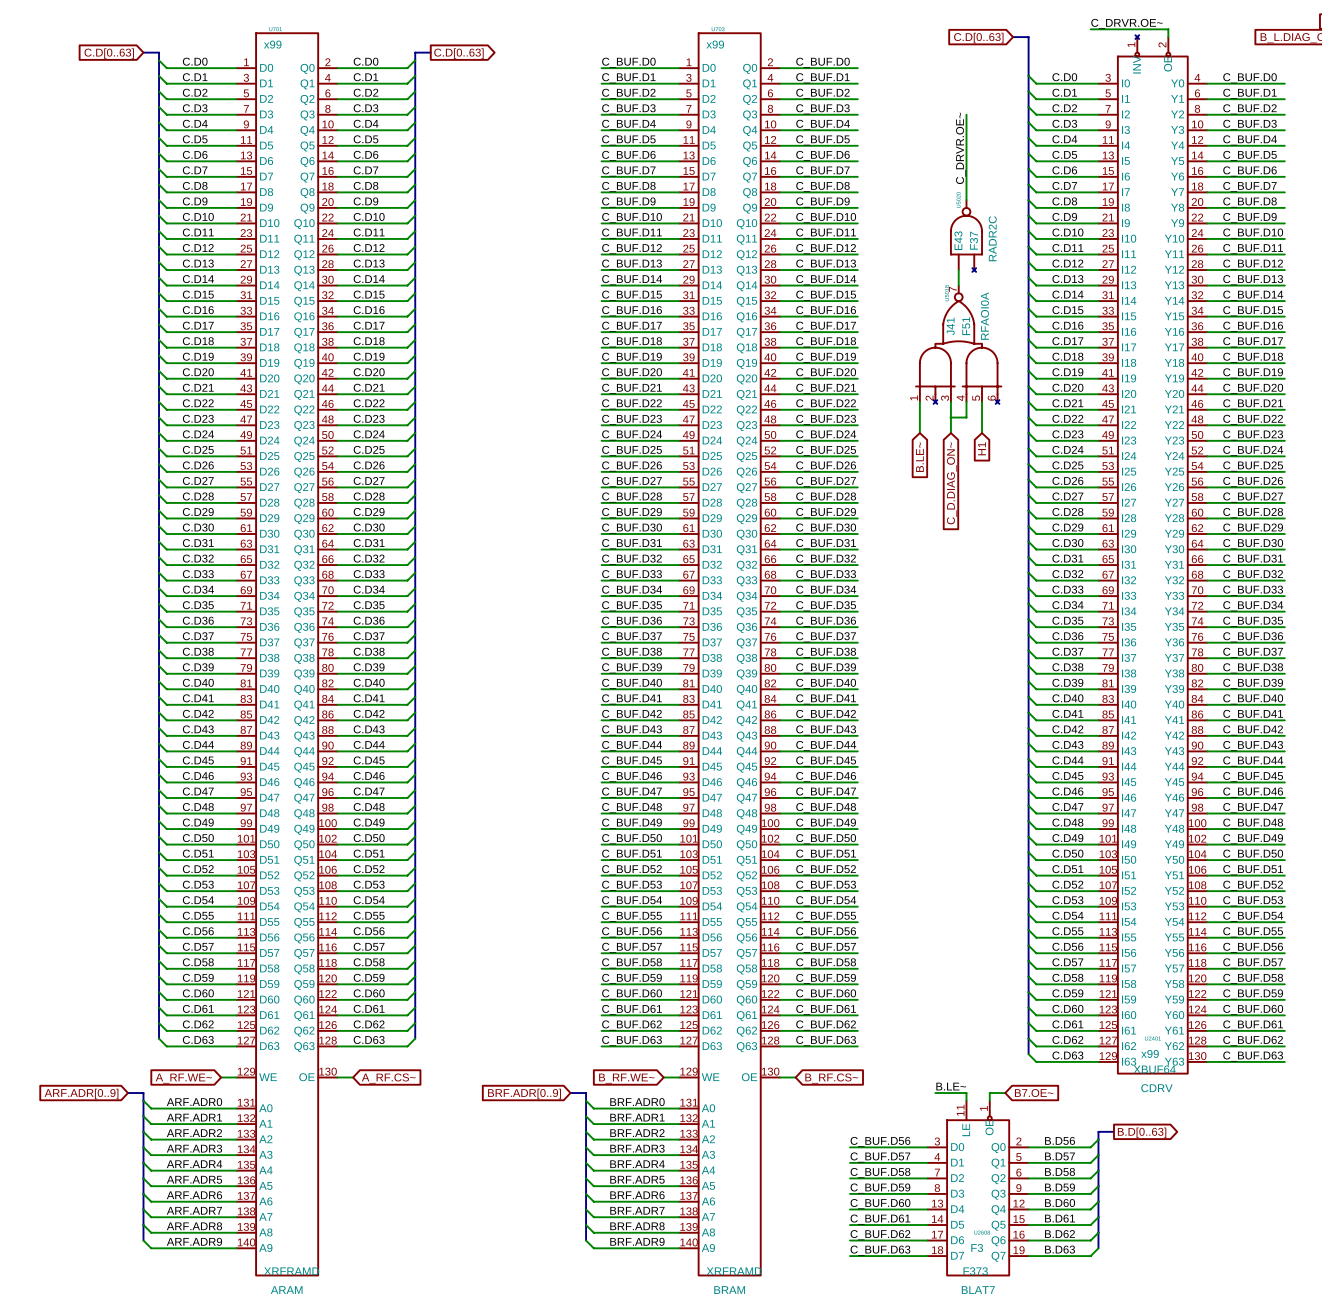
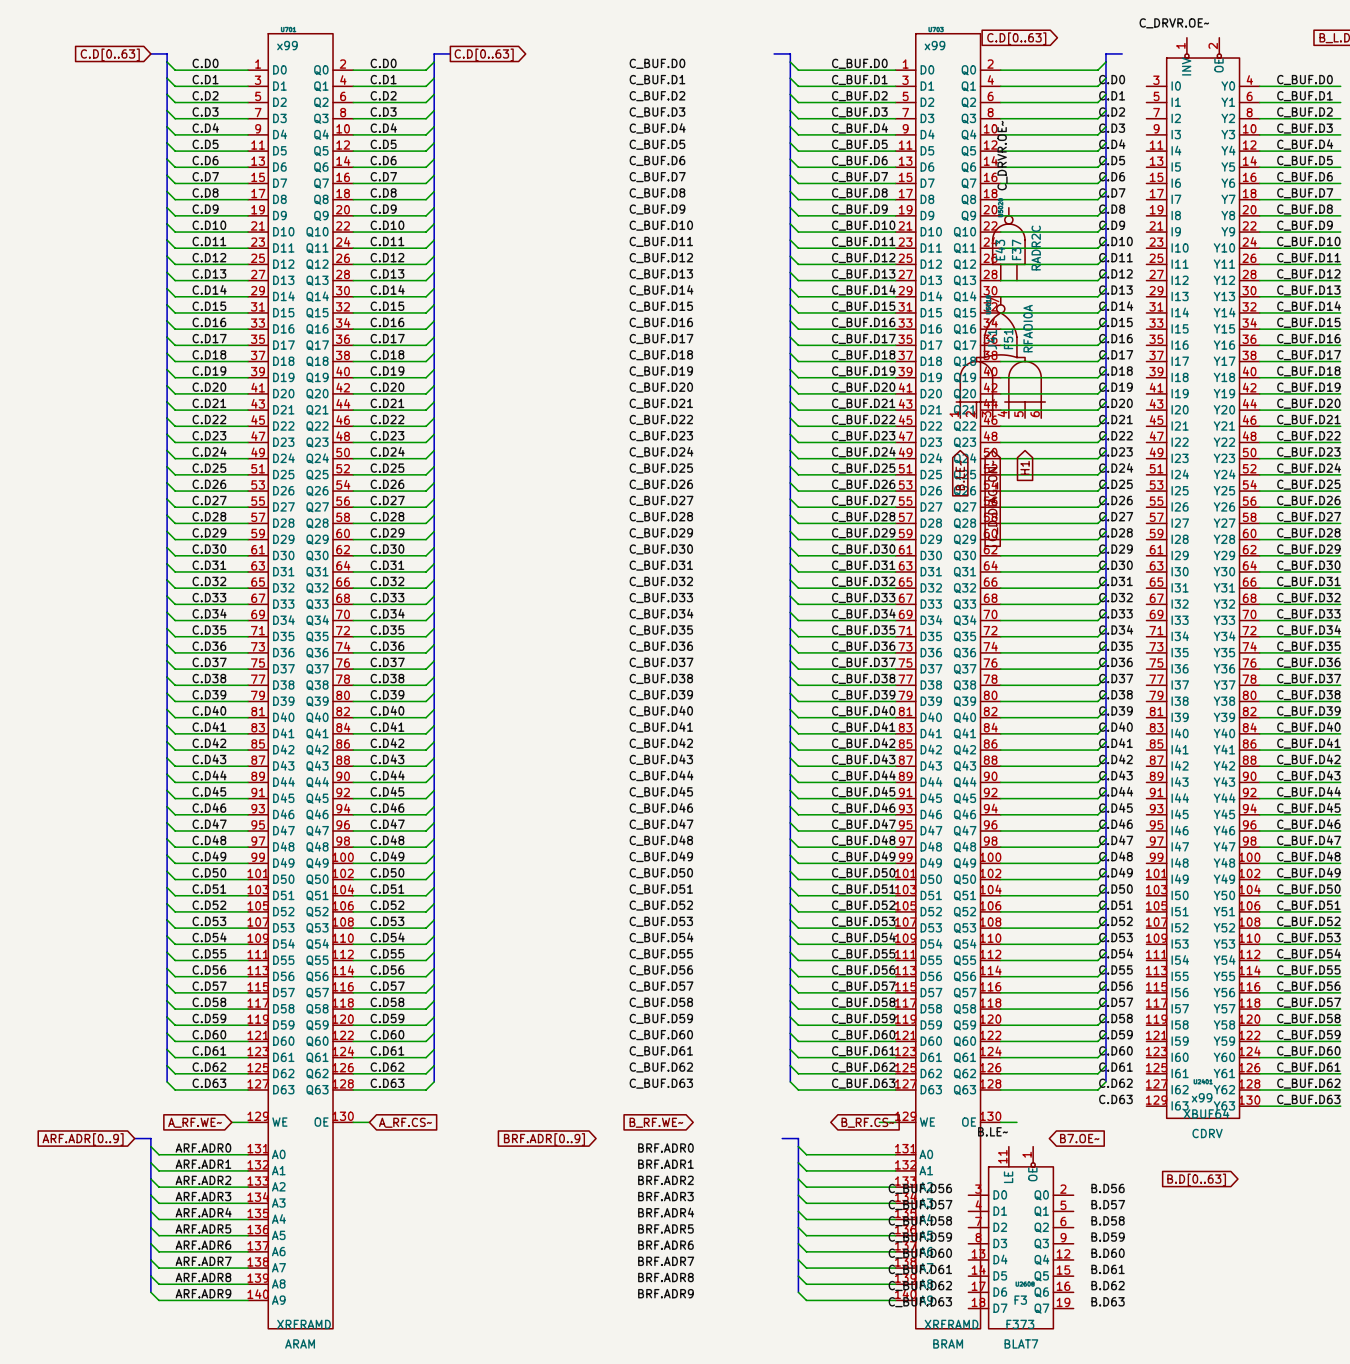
wire: (1090, 29) (1168, 29) (1168, 37) -> none
bus: (1013, 37) (1028, 37) (1028, 1054) -> none
no-connect mark: (1137, 37) -> none
bus: none -> (774, 53) (790, 53) (790, 1081)
bus: none -> (1122, 53) (1105, 53) (1105, 1081)
wire: none -> (1105, 62) (1097, 70) (1000, 70)
wire: (601, 68) (679, 68) -> none
wire: (1028, 75) (1036, 83) -> (1000, 86) (1081, 86)
wire: (601, 83) (679, 83) -> none
wire: (1051, 83) (1098, 83) -> (1097, 86) (1105, 78)
wire: (1028, 91) (1036, 99) -> (1000, 102) (1081, 102)
wire: (601, 99) (679, 99) -> none
wire: (1051, 99) (1098, 99) -> (1097, 102) (1105, 94)
wire: (1028, 106) (1036, 114) -> (1000, 118) (1081, 118)
wire: (601, 114) (679, 114) -> none
wire: (966, 114) (966, 200) -> none
wire: (1051, 114) (1098, 114) -> (1097, 118) (1105, 110)
wire: (1028, 122) (1036, 130) -> (1000, 134) (1081, 134)
wire: (601, 130) (679, 130) -> none
wire: (1051, 130) (1098, 130) -> (1097, 134) (1105, 126)
wire: (1028, 138) (1036, 145) -> (1000, 151) (1081, 151)
wire: (601, 145) (679, 145) -> none
wire: (1051, 145) (1098, 145) -> (1097, 151) (1105, 143)
wire: (1028, 153) (1036, 161) -> (1000, 167) (1081, 167)
wire: (601, 161) (679, 161) -> none
wire: (1051, 161) (1098, 161) -> (1097, 167) (1105, 159)
wire: (1028, 169) (1036, 176) -> (1000, 183) (1081, 183)
wire: (601, 176) (679, 176) -> none
wire: (1051, 176) (1098, 176) -> (1097, 183) (1105, 175)
wire: (1028, 184) (1036, 192) -> (1000, 199) (1081, 199)
wire: (601, 192) (679, 192) -> none
wire: (1051, 192) (1098, 192) -> (1097, 199) (1105, 191)
wire: (1028, 200) (1036, 207) -> (1000, 215) (1081, 215)
wire: (601, 207) (679, 207) -> none
wire: (1051, 207) (1098, 207) -> (1097, 215) (1105, 207)
wire: (1028, 215) (1036, 223) -> (1000, 232) (1081, 232)
wire: (601, 223) (679, 223) -> none
wire: (1051, 223) (1098, 223) -> (1097, 232) (1105, 223)
wire: (1028, 231) (1036, 238) -> (1000, 248) (1081, 248)
wire: (601, 238) (679, 238) -> none
wire: (1051, 238) (1098, 238) -> (1097, 248) (1105, 240)
wire: (1028, 246) (1036, 254) -> (1000, 264) (1081, 264)
wire: (601, 254) (679, 254) -> none
wire: (1051, 254) (1098, 254) -> (1097, 264) (1105, 256)
wire: (1028, 262) (1036, 270) -> (1000, 280) (1081, 280)
wire: (601, 270) (679, 270) -> none
wire: (958, 270) (958, 285) -> none
no-connect mark: (974, 270) -> none
wire: (1051, 270) (1098, 270) -> (1097, 280) (1105, 272)
wire: (1028, 277) (1036, 285) -> (1000, 296) (1081, 296)
wire: (601, 285) (679, 285) -> none
wire: (1051, 285) (1098, 285) -> (1097, 296) (1105, 288)
wire: (1028, 293) (1036, 301) -> (1000, 312) (1081, 312)
wire: (601, 301) (679, 301) -> none
wire: (1051, 301) (1098, 301) -> (1097, 312) (1105, 304)
wire: (1028, 308) (1036, 316) -> (1000, 329) (1081, 329)
wire: (601, 316) (679, 316) -> none
wire: (1051, 316) (1098, 316) -> (1097, 329) (1105, 321)
wire: (1028, 324) (1036, 332) -> (1000, 345) (1081, 345)
wire: (601, 332) (679, 332) -> none
wire: (1051, 332) (1098, 332) -> (1097, 345) (1105, 337)
wire: (1028, 339) (1036, 347) -> (1000, 361) (1081, 361)
wire: (601, 347) (679, 347) -> none
wire: (1051, 347) (1098, 347) -> (1097, 361) (1105, 353)
wire: (1028, 355) (1036, 363) -> (1000, 377) (1081, 377)
wire: (601, 363) (679, 363) -> none
wire: (1051, 363) (1098, 363) -> (1097, 377) (1105, 369)
wire: (1028, 370) (1036, 378) -> (1000, 393) (1081, 393)
wire: (601, 378) (679, 378) -> none
wire: (1051, 378) (1098, 378) -> (1097, 393) (1105, 385)
wire: (1028, 386) (1036, 394) -> (1000, 410) (1081, 410)
wire: (601, 394) (679, 394) -> none
wire: (1051, 394) (1098, 394) -> (1097, 410) (1105, 402)
wire: (919, 402) (919, 433) -> none
no-connect mark: (935, 402) -> none
wire: (950, 402) (950, 433) -> none
wire: (966, 402) (966, 417) (950, 417) -> none
wire: (982, 402) (982, 433) -> none
no-connect mark: (997, 402) -> none
wire: (1028, 402) (1036, 409) -> (1000, 426) (1081, 426)
wire: (601, 409) (679, 409) -> none
wire: (1051, 409) (1098, 409) -> (1097, 426) (1105, 418)
wire: (1028, 417) (1036, 425) -> (1000, 442) (1081, 442)
wire: (601, 425) (679, 425) -> none
wire: (1051, 425) (1098, 425) -> (1097, 442) (1105, 434)
wire: (1028, 433) (1036, 440) -> (1000, 458) (1081, 458)
wire: (601, 440) (679, 440) -> none
wire: (1051, 440) (1098, 440) -> (1097, 458) (1105, 450)
wire: (1028, 448) (1036, 456) -> (1000, 474) (1081, 474)
wire: (601, 456) (679, 456) -> none
wire: (1051, 456) (1098, 456) -> (1097, 474) (1105, 466)
wire: (1028, 464) (1036, 471) -> (1000, 491) (1081, 491)
wire: (601, 471) (679, 471) -> none
wire: (1051, 471) (1098, 471) -> (1097, 491) (1105, 482)
wire: (1028, 479) (1036, 487) -> (1000, 507) (1081, 507)
wire: (601, 487) (679, 487) -> none
wire: (1051, 487) (1098, 487) -> (1097, 507) (1105, 499)
wire: (1028, 495) (1036, 502) -> (1000, 523) (1081, 523)
wire: (601, 502) (679, 502) -> none
wire: (1051, 502) (1098, 502) -> (1097, 523) (1105, 515)
wire: (1028, 510) (1036, 518) -> (1000, 539) (1081, 539)
wire: (601, 518) (679, 518) -> none
wire: (1051, 518) (1098, 518) -> (1097, 539) (1105, 531)
wire: (1028, 526) (1036, 534) -> (1000, 555) (1081, 555)
wire: (601, 534) (679, 534) -> none
wire: (1051, 534) (1098, 534) -> (1097, 555) (1105, 547)
wire: (1028, 541) (1036, 549) -> (1000, 571) (1081, 571)
wire: (601, 549) (679, 549) -> none
wire: (1051, 549) (1098, 549) -> (1097, 571) (1105, 563)
wire: (1028, 557) (1036, 565) -> (1000, 588) (1081, 588)
wire: (601, 565) (679, 565) -> none
wire: (1051, 565) (1098, 565) -> (1097, 588) (1105, 580)
wire: (1028, 572) (1036, 580) -> (1000, 604) (1081, 604)
wire: (601, 580) (679, 580) -> none
wire: (1051, 580) (1098, 580) -> (1097, 604) (1105, 596)
wire: (1028, 588) (1036, 596) -> (1000, 620) (1081, 620)
wire: (601, 596) (679, 596) -> none
wire: (1051, 596) (1098, 596) -> (1097, 620) (1105, 612)
wire: (1028, 603) (1036, 611) -> (1000, 636) (1081, 636)
wire: (601, 611) (679, 611) -> none
wire: (1051, 611) (1098, 611) -> (1097, 636) (1105, 628)
wire: (1028, 619) (1036, 627) -> (1000, 652) (1081, 652)
wire: (601, 627) (679, 627) -> none
wire: (1051, 627) (1098, 627) -> (1097, 652) (1105, 644)
wire: (1028, 634) (1036, 642) -> (1000, 669) (1081, 669)
wire: (601, 642) (679, 642) -> none
wire: (1051, 642) (1098, 642) -> (1097, 669) (1105, 661)
wire: (1028, 650) (1036, 658) -> (1000, 685) (1081, 685)
part position: (729, 654) -> (948, 681)
wire: (601, 658) (679, 658) -> none
wire: (1051, 658) (1098, 658) -> (1097, 685) (1105, 677)
wire: (1028, 665) (1036, 673) -> (1000, 701) (1081, 701)
wire: (601, 673) (679, 673) -> none
wire: (1051, 673) (1098, 673) -> (1097, 701) (1105, 693)
wire: (1028, 681) (1036, 689) -> (1000, 717) (1081, 717)
wire: (601, 689) (679, 689) -> none
wire: (1051, 689) (1098, 689) -> (1097, 717) (1105, 709)
wire: (1028, 697) (1036, 704) -> (1000, 733) (1081, 733)
wire: (601, 704) (679, 704) -> none
wire: (1051, 704) (1098, 704) -> (1097, 733) (1105, 725)
wire: (1028, 712) (1036, 720) -> (1000, 750) (1081, 750)
wire: (601, 720) (679, 720) -> none
wire: (1051, 720) (1098, 720) -> (1097, 750) (1105, 741)
wire: (1028, 728) (1036, 735) -> (1000, 766) (1081, 766)
wire: (601, 735) (679, 735) -> none
wire: (1051, 735) (1098, 735) -> (1097, 766) (1105, 758)
wire: (1028, 743) (1036, 751) -> (1000, 782) (1081, 782)
wire: (601, 751) (679, 751) -> none
wire: (1051, 751) (1098, 751) -> (1097, 782) (1105, 774)
wire: (1028, 759) (1036, 766) -> (1000, 798) (1081, 798)
wire: (601, 766) (679, 766) -> none
wire: (1051, 766) (1098, 766) -> (1097, 798) (1105, 790)
wire: (1028, 774) (1036, 782) -> (1000, 814) (1081, 814)
wire: (601, 782) (679, 782) -> none
wire: (1051, 782) (1098, 782) -> (1097, 814) (1105, 806)
wire: (1028, 790) (1036, 797) -> (1000, 830) (1081, 830)
wire: (601, 797) (679, 797) -> none
wire: (1051, 797) (1098, 797) -> (1097, 830) (1105, 822)
wire: (1028, 805) (1036, 813) -> (1000, 847) (1081, 847)
wire: (601, 813) (679, 813) -> none
wire: (1051, 813) (1098, 813) -> (1097, 847) (1105, 839)
wire: (1028, 821) (1036, 829) -> (1000, 863) (1081, 863)
wire: (601, 829) (679, 829) -> none
wire: (1051, 829) (1098, 829) -> (1097, 863) (1105, 855)
wire: (1028, 836) (1036, 844) -> (1000, 879) (1081, 879)
wire: (601, 844) (679, 844) -> none
wire: (1051, 844) (1098, 844) -> (1097, 879) (1105, 871)
wire: (1028, 852) (1036, 860) -> (1000, 895) (1081, 895)
wire: (601, 860) (679, 860) -> none
wire: (1051, 860) (1098, 860) -> (1097, 895) (1105, 887)
wire: (1028, 867) (1036, 875) -> (1000, 911) (1081, 911)
wire: (601, 875) (679, 875) -> none
wire: (1051, 875) (1098, 875) -> (1097, 911) (1105, 903)
wire: (1028, 883) (1036, 891) -> (1000, 928) (1081, 928)
wire: (601, 891) (679, 891) -> none
wire: (1051, 891) (1098, 891) -> (1097, 928) (1105, 920)
wire: (1028, 898) (1036, 906) -> (1000, 944) (1081, 944)
wire: (601, 906) (679, 906) -> none
wire: (1051, 906) (1098, 906) -> (1097, 944) (1105, 936)
wire: (1028, 914) (1036, 922) -> (1000, 960) (1081, 960)
wire: (601, 922) (679, 922) -> none
wire: (1051, 922) (1098, 922) -> (1097, 960) (1105, 952)
wire: (1028, 929) (1036, 937) -> (1000, 976) (1081, 976)
wire: (601, 937) (679, 937) -> none
wire: (1051, 937) (1098, 937) -> (1097, 976) (1105, 968)
wire: (1028, 945) (1036, 953) -> (1000, 992) (1081, 992)
wire: (601, 953) (679, 953) -> none
wire: (1051, 953) (1098, 953) -> (1097, 992) (1105, 984)
wire: (1028, 961) (1036, 968) -> (1000, 1009) (1081, 1009)
wire: (601, 968) (679, 968) -> none
wire: (1051, 968) (1098, 968) -> (1097, 1009) (1105, 1000)
wire: (1028, 976) (1036, 984) -> (1000, 1025) (1081, 1025)
wire: (601, 984) (679, 984) -> none
wire: (1051, 984) (1098, 984) -> (1097, 1025) (1105, 1017)
wire: (1028, 992) (1036, 999) -> (1000, 1041) (1081, 1041)
wire: (601, 999) (679, 999) -> none
wire: (1051, 999) (1098, 999) -> (1097, 1041) (1105, 1033)
wire: (1028, 1007) (1036, 1015) -> (1000, 1057) (1081, 1057)
wire: (601, 1015) (679, 1015) -> none
wire: (1051, 1015) (1098, 1015) -> (1097, 1057) (1105, 1049)
wire: (1028, 1023) (1036, 1030) -> (1000, 1073) (1081, 1073)
wire: (601, 1030) (679, 1030) -> none
wire: (1051, 1030) (1098, 1030) -> (1097, 1073) (1105, 1065)
wire: (1028, 1038) (1036, 1046) -> (1000, 1089) (1081, 1089)
wire: (601, 1046) (679, 1046) -> none
wire: (1051, 1046) (1098, 1046) -> (1097, 1089) (1105, 1081)
wire: (1028, 1054) (1036, 1061) (1098, 1061) -> none
wire: (663, 1077) (679, 1077) -> none
wire: (780, 1077) (795, 1077) -> (879, 1122) (895, 1122)
wire: none -> (1000, 1122) (1016, 1122)
bus: (570, 1093) (586, 1093) (586, 1240) -> none
bus: none -> (782, 1138) (798, 1138) (798, 1292)
wire: (935, 1093) (966, 1093) (966, 1100) -> none
wire: (1005, 1093) (989, 1093) (989, 1100) -> none
wire: (586, 1100) (593, 1108) (679, 1108) -> none
wire: none -> (798, 1146) (806, 1154) (895, 1154)
wire: (586, 1116) (593, 1124) (679, 1124) -> none
wire: none -> (798, 1162) (806, 1170) (895, 1170)
wire: (586, 1131) (593, 1139) (679, 1139) -> none
wire: none -> (798, 1179) (806, 1187) (895, 1187)
bus: (1114, 1131) (1098, 1131) (1098, 1248) -> none
wire: (1098, 1139) (1090, 1147) (1028, 1147) -> none
wire: (586, 1147) (593, 1155) (679, 1155) -> none
wire: none -> (798, 1195) (806, 1203) (895, 1203)
wire: (850, 1147) (927, 1147) -> none
wire: (1098, 1155) (1090, 1162) (1028, 1162) -> none
wire: (586, 1162) (593, 1170) (679, 1170) -> none
wire: none -> (798, 1211) (806, 1219) (895, 1219)
wire: (850, 1162) (927, 1162) -> none
wire: (1098, 1170) (1090, 1178) (1028, 1178) -> none
wire: (586, 1178) (593, 1186) (679, 1186) -> none
wire: none -> (798, 1227) (806, 1235) (895, 1235)
wire: (850, 1178) (927, 1178) -> none
wire: (1098, 1186) (1090, 1193) (1028, 1193) -> none
wire: (586, 1193) (593, 1201) (679, 1201) -> none
wire: none -> (798, 1243) (806, 1251) (895, 1251)
wire: (850, 1193) (927, 1193) -> none
wire: (1098, 1201) (1090, 1209) (1028, 1209) -> none
wire: (586, 1209) (593, 1217) (679, 1217) -> none
wire: none -> (798, 1259) (806, 1268) (895, 1268)
wire: (850, 1209) (927, 1209) -> none
wire: (1098, 1217) (1090, 1225) (1028, 1225) -> none
wire: (586, 1225) (593, 1232) (679, 1232) -> none
wire: none -> (798, 1276) (806, 1284) (895, 1284)
wire: (850, 1225) (927, 1225) -> none
wire: (1098, 1232) (1090, 1240) (1028, 1240) -> none
wire: (586, 1240) (593, 1248) (679, 1248) -> none
wire: none -> (798, 1292) (806, 1300) (895, 1300)
wire: (850, 1240) (927, 1240) -> none
wire: (1098, 1248) (1090, 1256) (1028, 1256) -> none
wire: (850, 1256) (927, 1256) -> none

